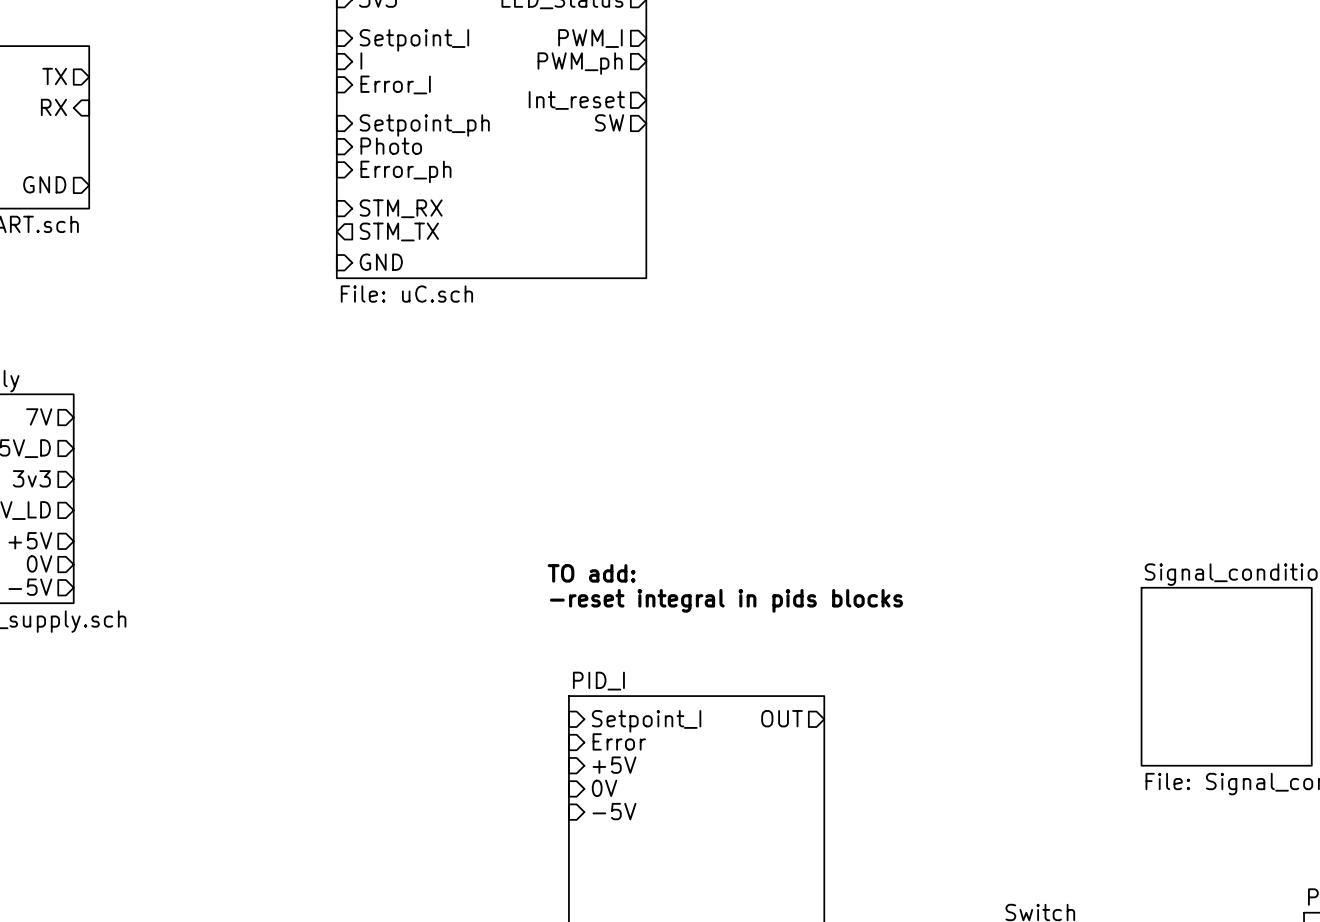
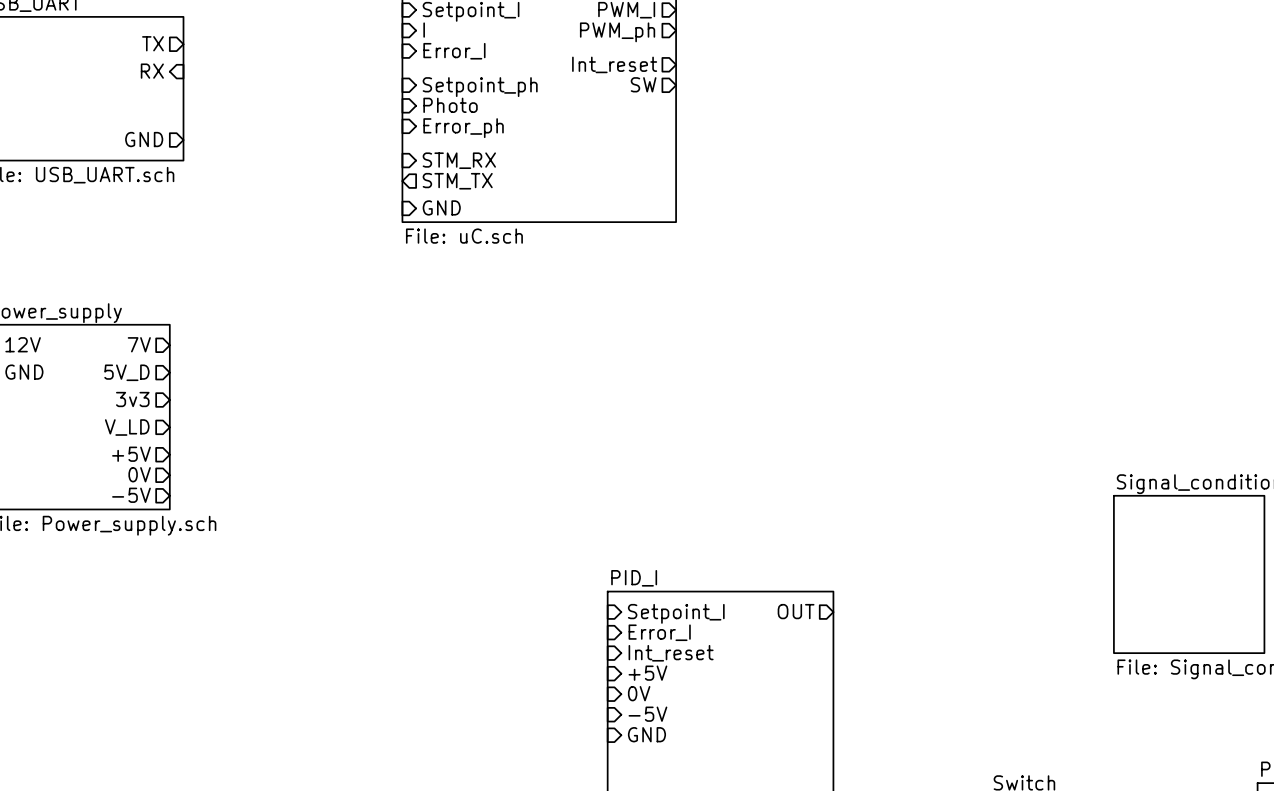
text: TO add: (591, 573) -> none
text: -reset integral in pids blocks (726, 600) -> none
sheet pin: Error (619, 741) -> Error_I (659, 632)
sheet pin: +5V (614, 765) -> Int_reset (671, 653)
sheet pin: 0V (604, 788) -> +5V (647, 673)
sheet pin: -5V (614, 811) -> 0V (639, 693)
sheet pin: none -> -5V (647, 714)
sheet pin: none -> GND (646, 734)

